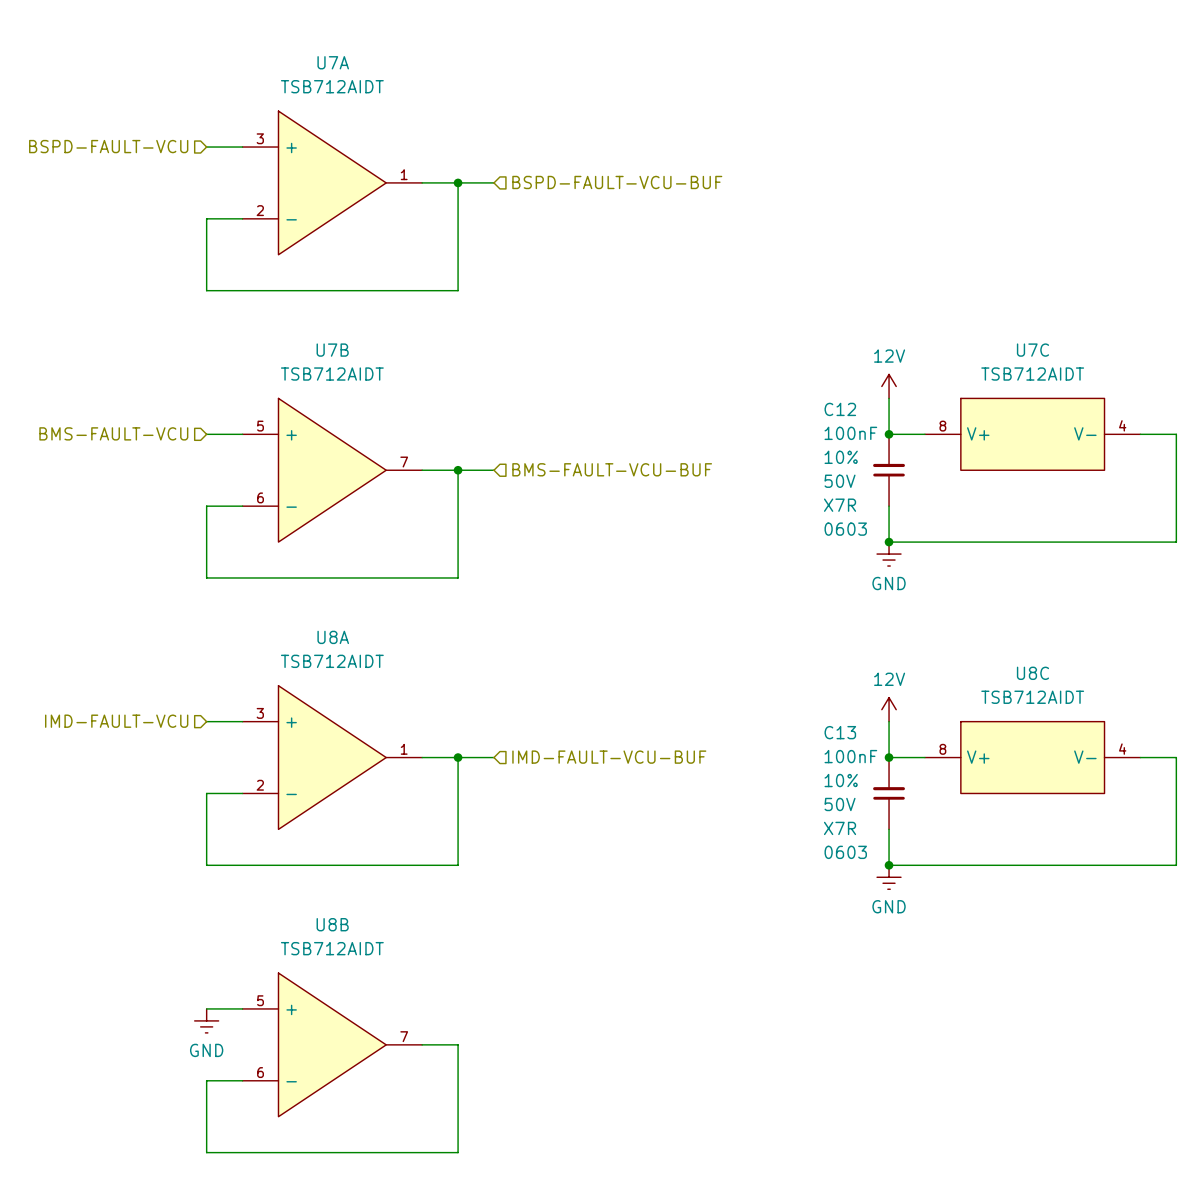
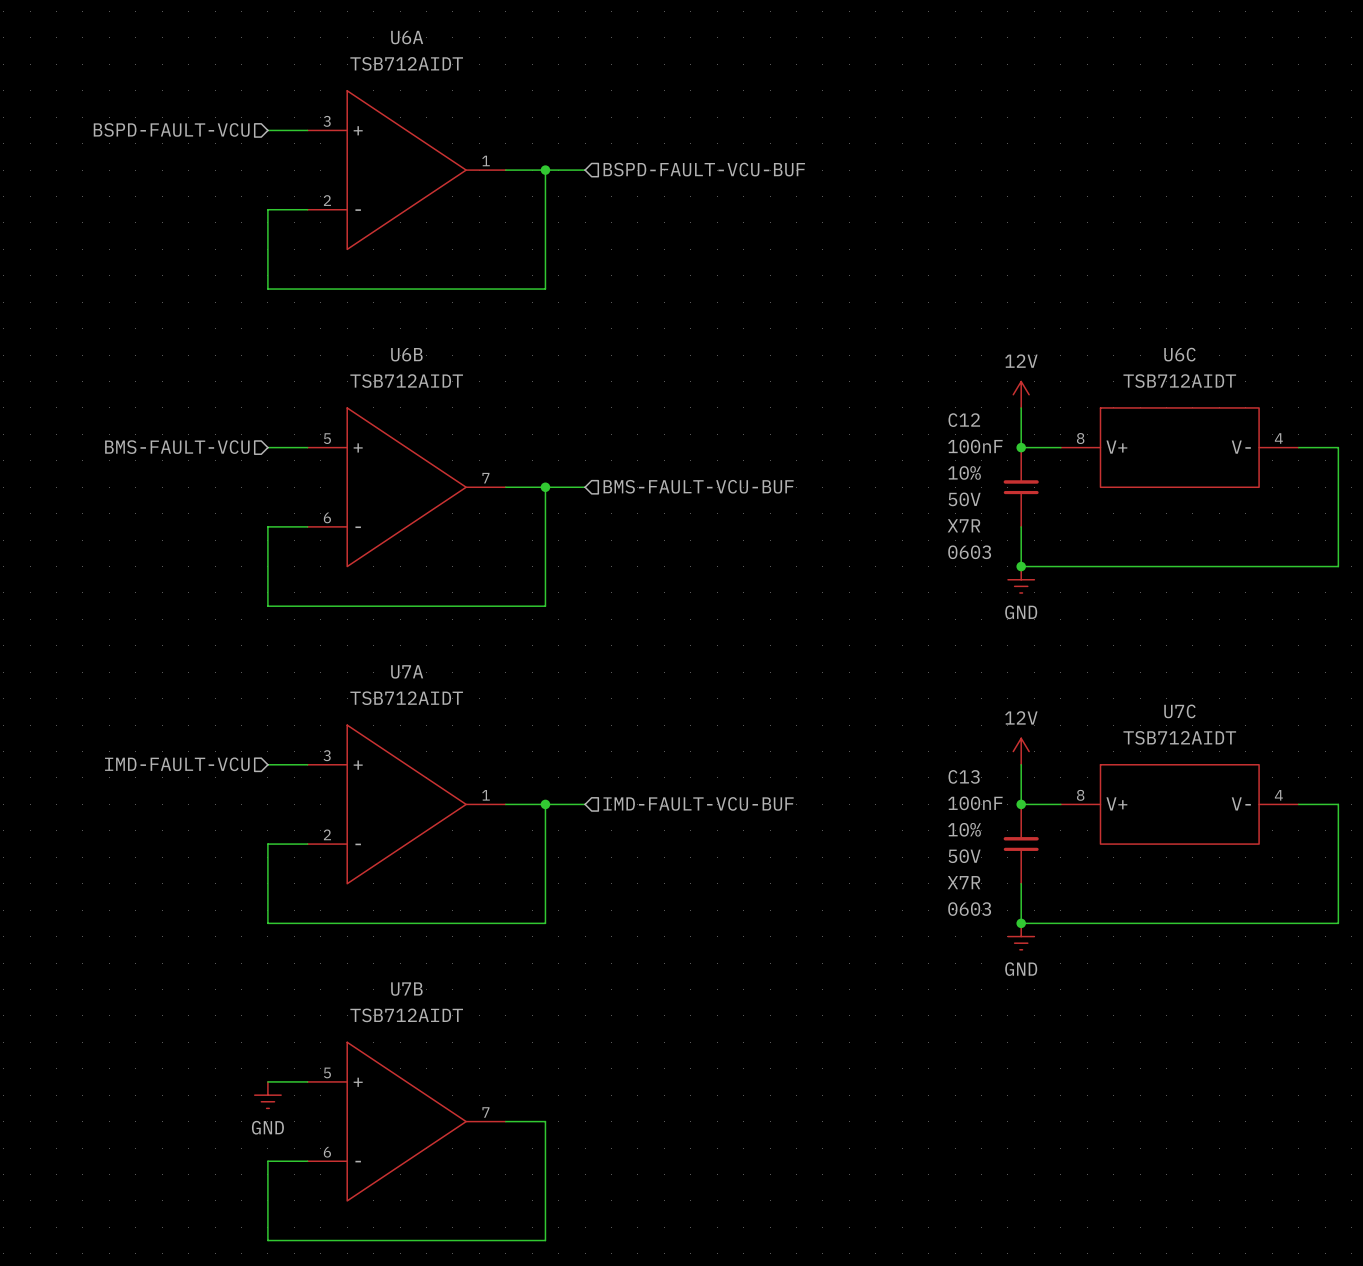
U7A name: U7A (333, 62) -> U6A (407, 37)
U7B name: U7B (332, 350) -> U6B (406, 354)
U7C name: U7C (1032, 350) -> U6C (1179, 354)
U8A name: U8A (333, 637) -> U7A (407, 671)
U8C name: U8C (1032, 673) -> U7C (1179, 711)
U8B name: U8B (332, 924) -> U7B (406, 989)

